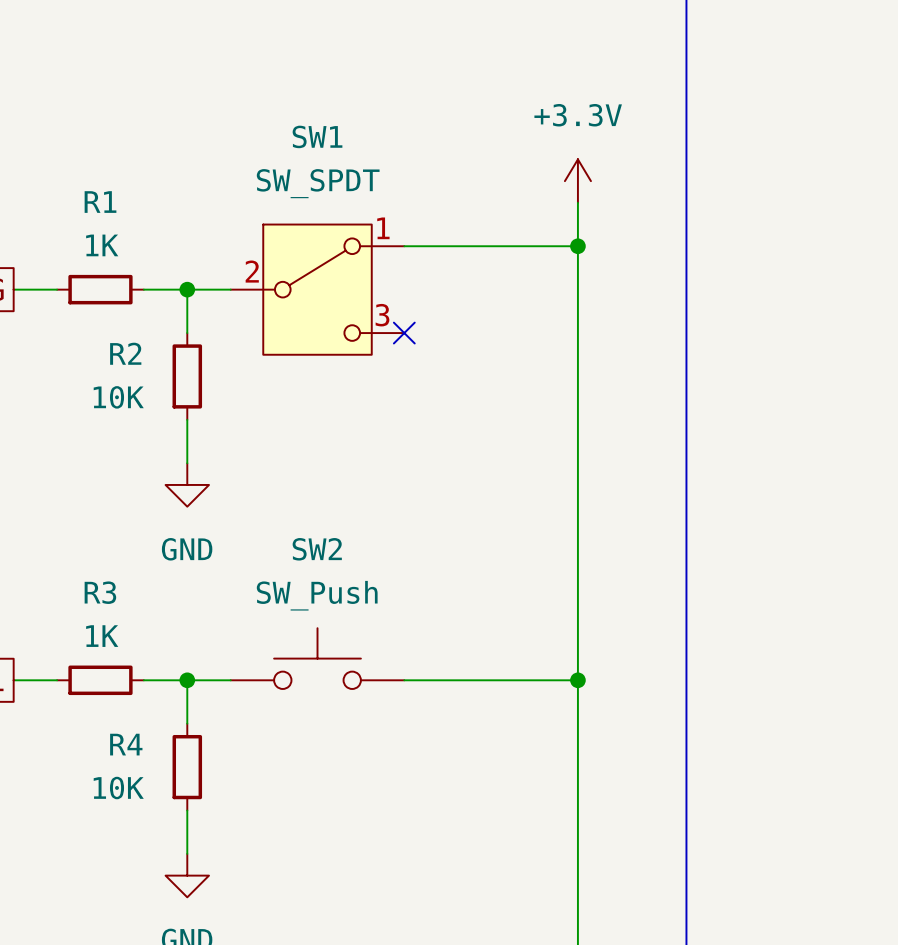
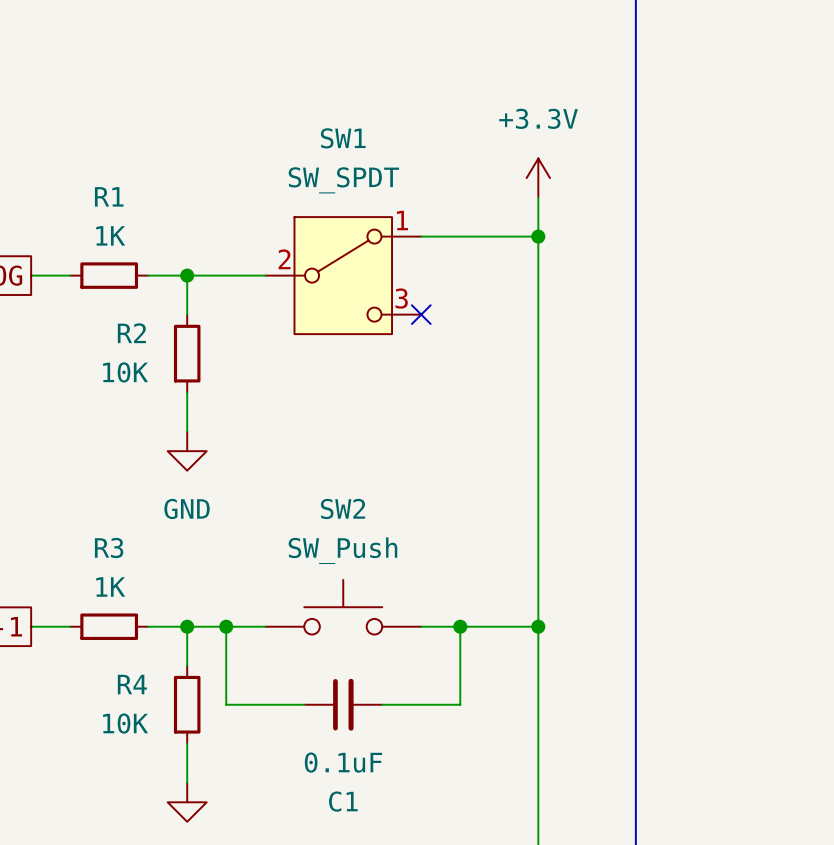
SW1 position: (317, 289) -> (343, 275)
no-connect mark position: (404, 333) -> (421, 314)
SW2 position: (317, 658) -> (343, 607)
junction: none -> (226, 626)
wire: none -> (265, 626) (226, 626) (226, 704) (304, 704)
wire: none -> (460, 626) (460, 704) (382, 704)
junction: none -> (460, 626)
C1: none -> 0.1uF (343, 704)

